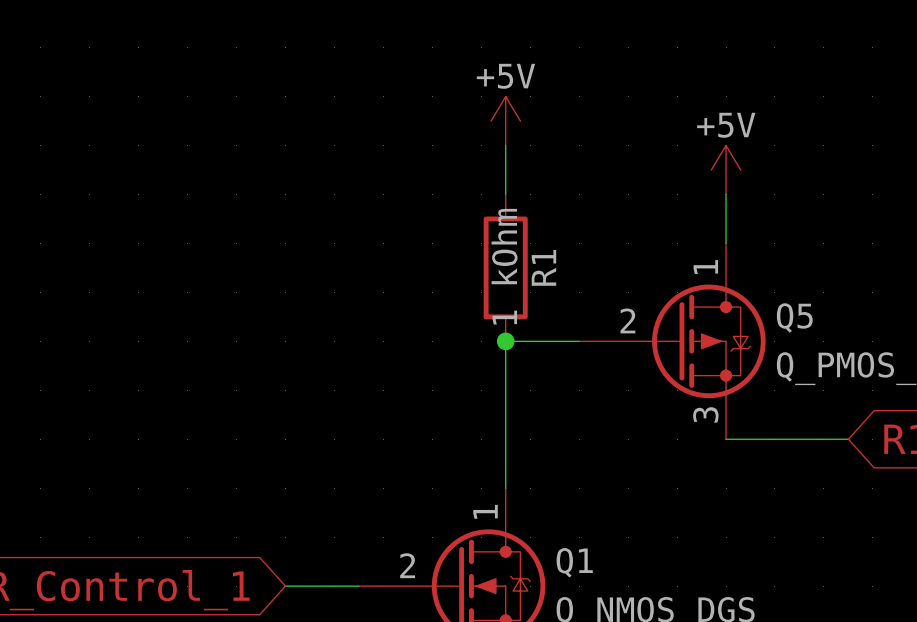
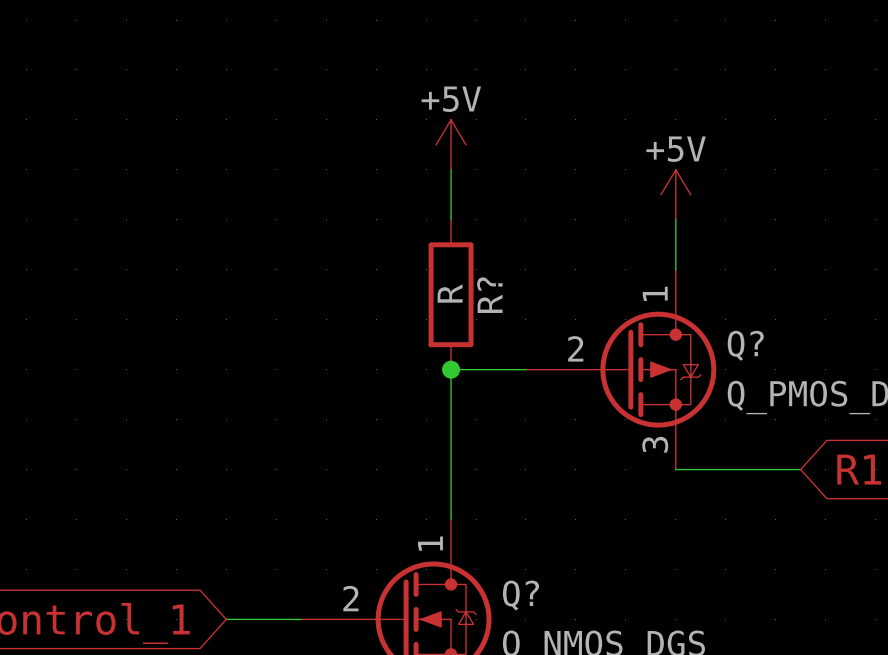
R1 value: 1 kOhm (504, 266) -> R (450, 293)
R1 name: R1 (543, 267) -> R? (489, 295)
Q5 name: Q5 (794, 317) -> Q? (745, 345)
Q1 name: Q1 (574, 562) -> Q? (520, 595)

